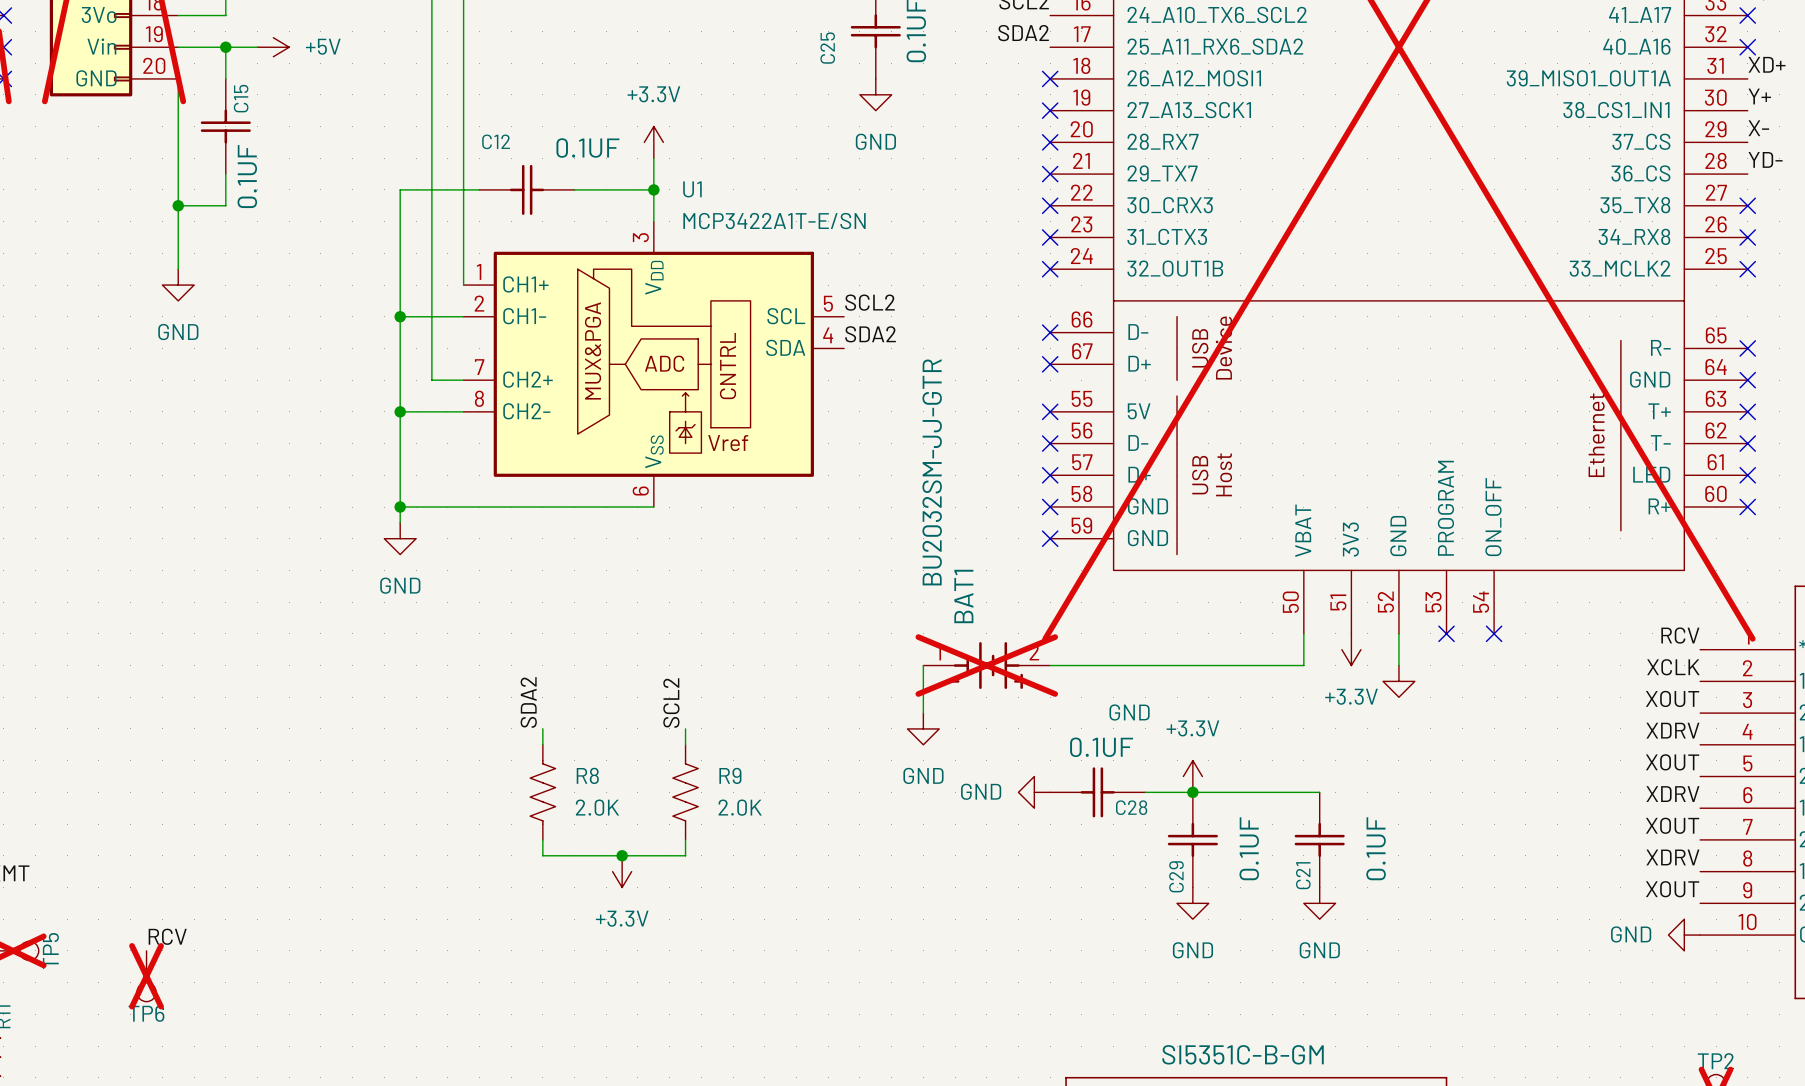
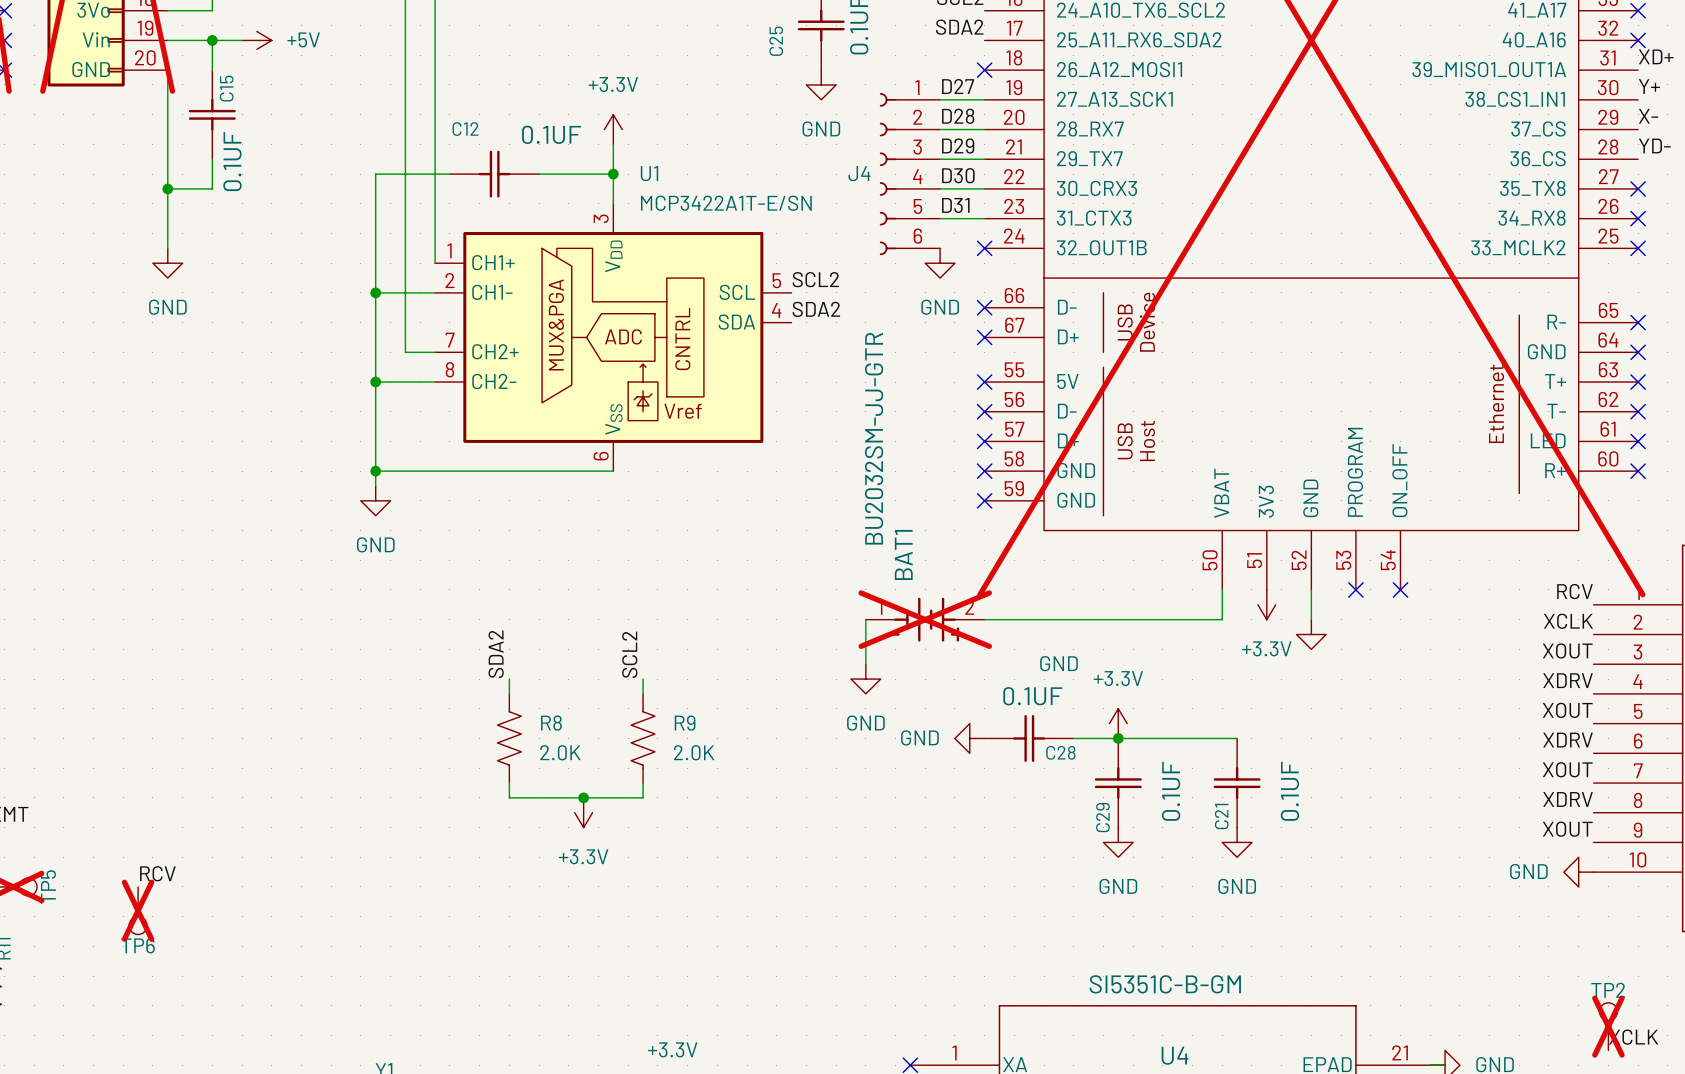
label: none -> D27 (958, 86)
wire: none -> (940, 99) (984, 99)
no-connect mark: (1050, 110) -> none
label: none -> D28 (958, 116)
wire: none -> (940, 129) (984, 129)
no-connect mark: (1050, 142) -> none
label: none -> D29 (958, 145)
wire: none -> (940, 159) (984, 159)
no-connect mark: (1050, 174) -> none
J4: none -> (909, 174)
label: none -> D30 (958, 175)
wire: none -> (940, 188) (984, 188)
no-connect mark: (1050, 205) -> none
label: none -> D31 (955, 205)
wire: none -> (940, 218) (984, 218)
no-connect mark: (1050, 237) -> none
power symbol: none -> GND (940, 263)

